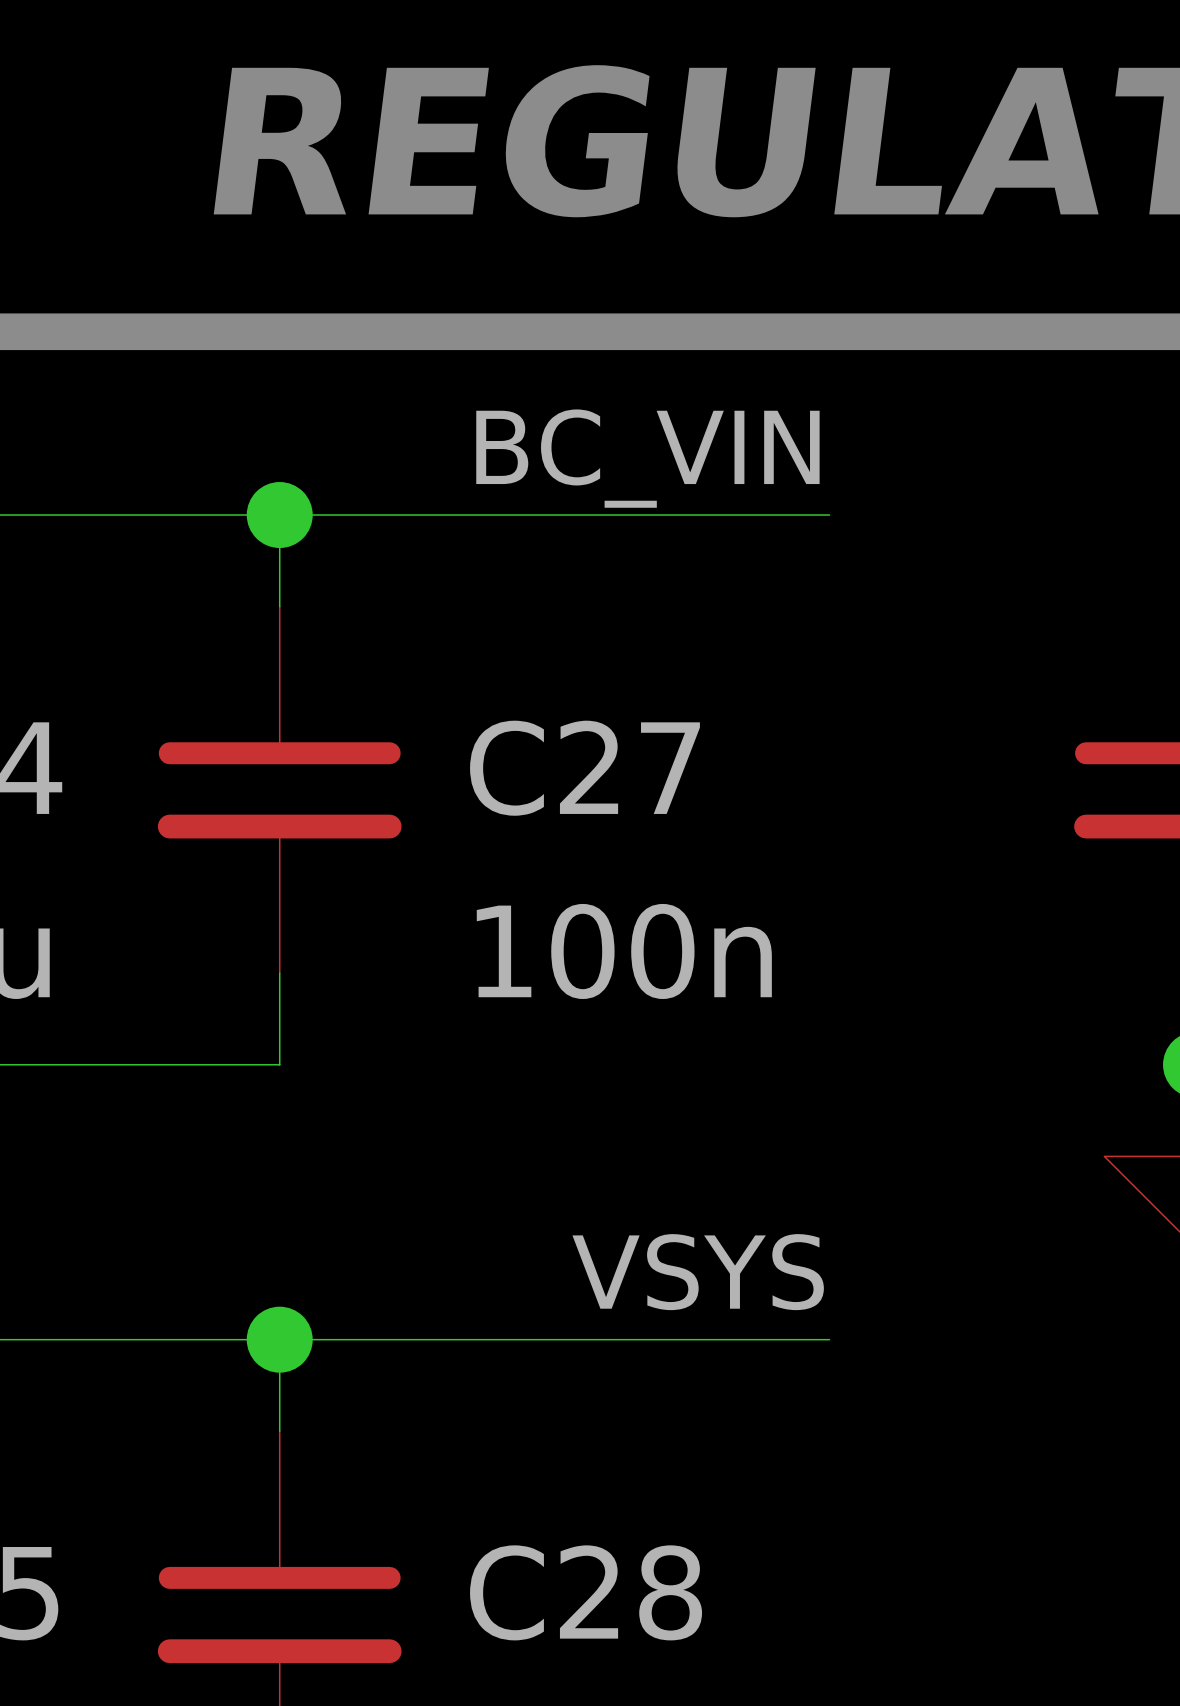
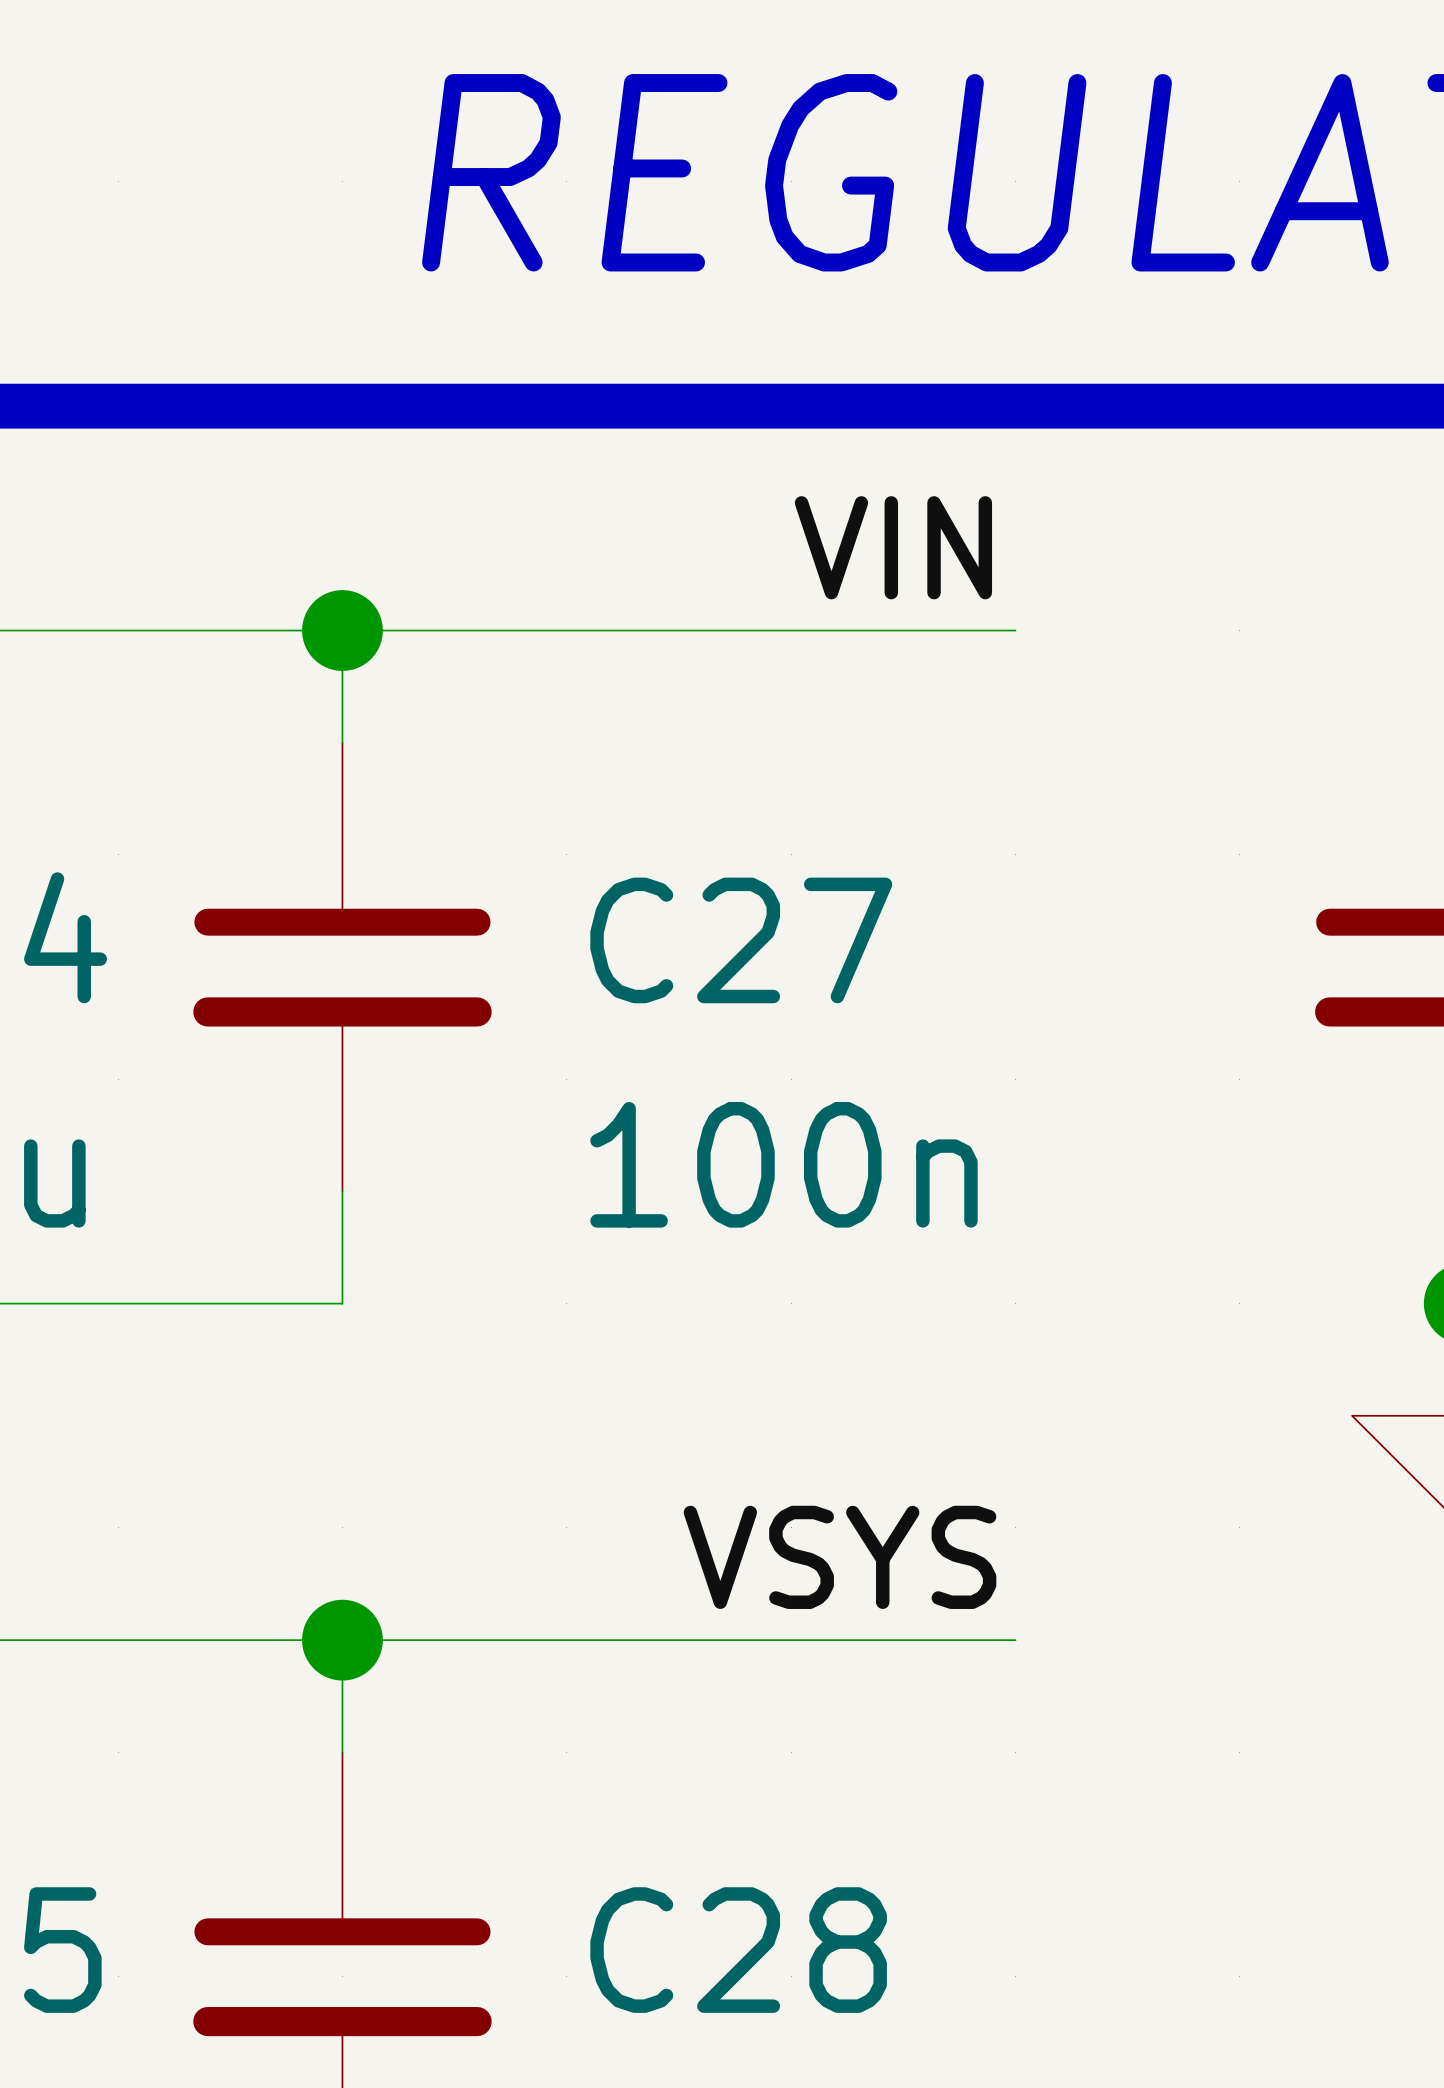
label: BC_VIN (647, 458) -> VIN (893, 547)

